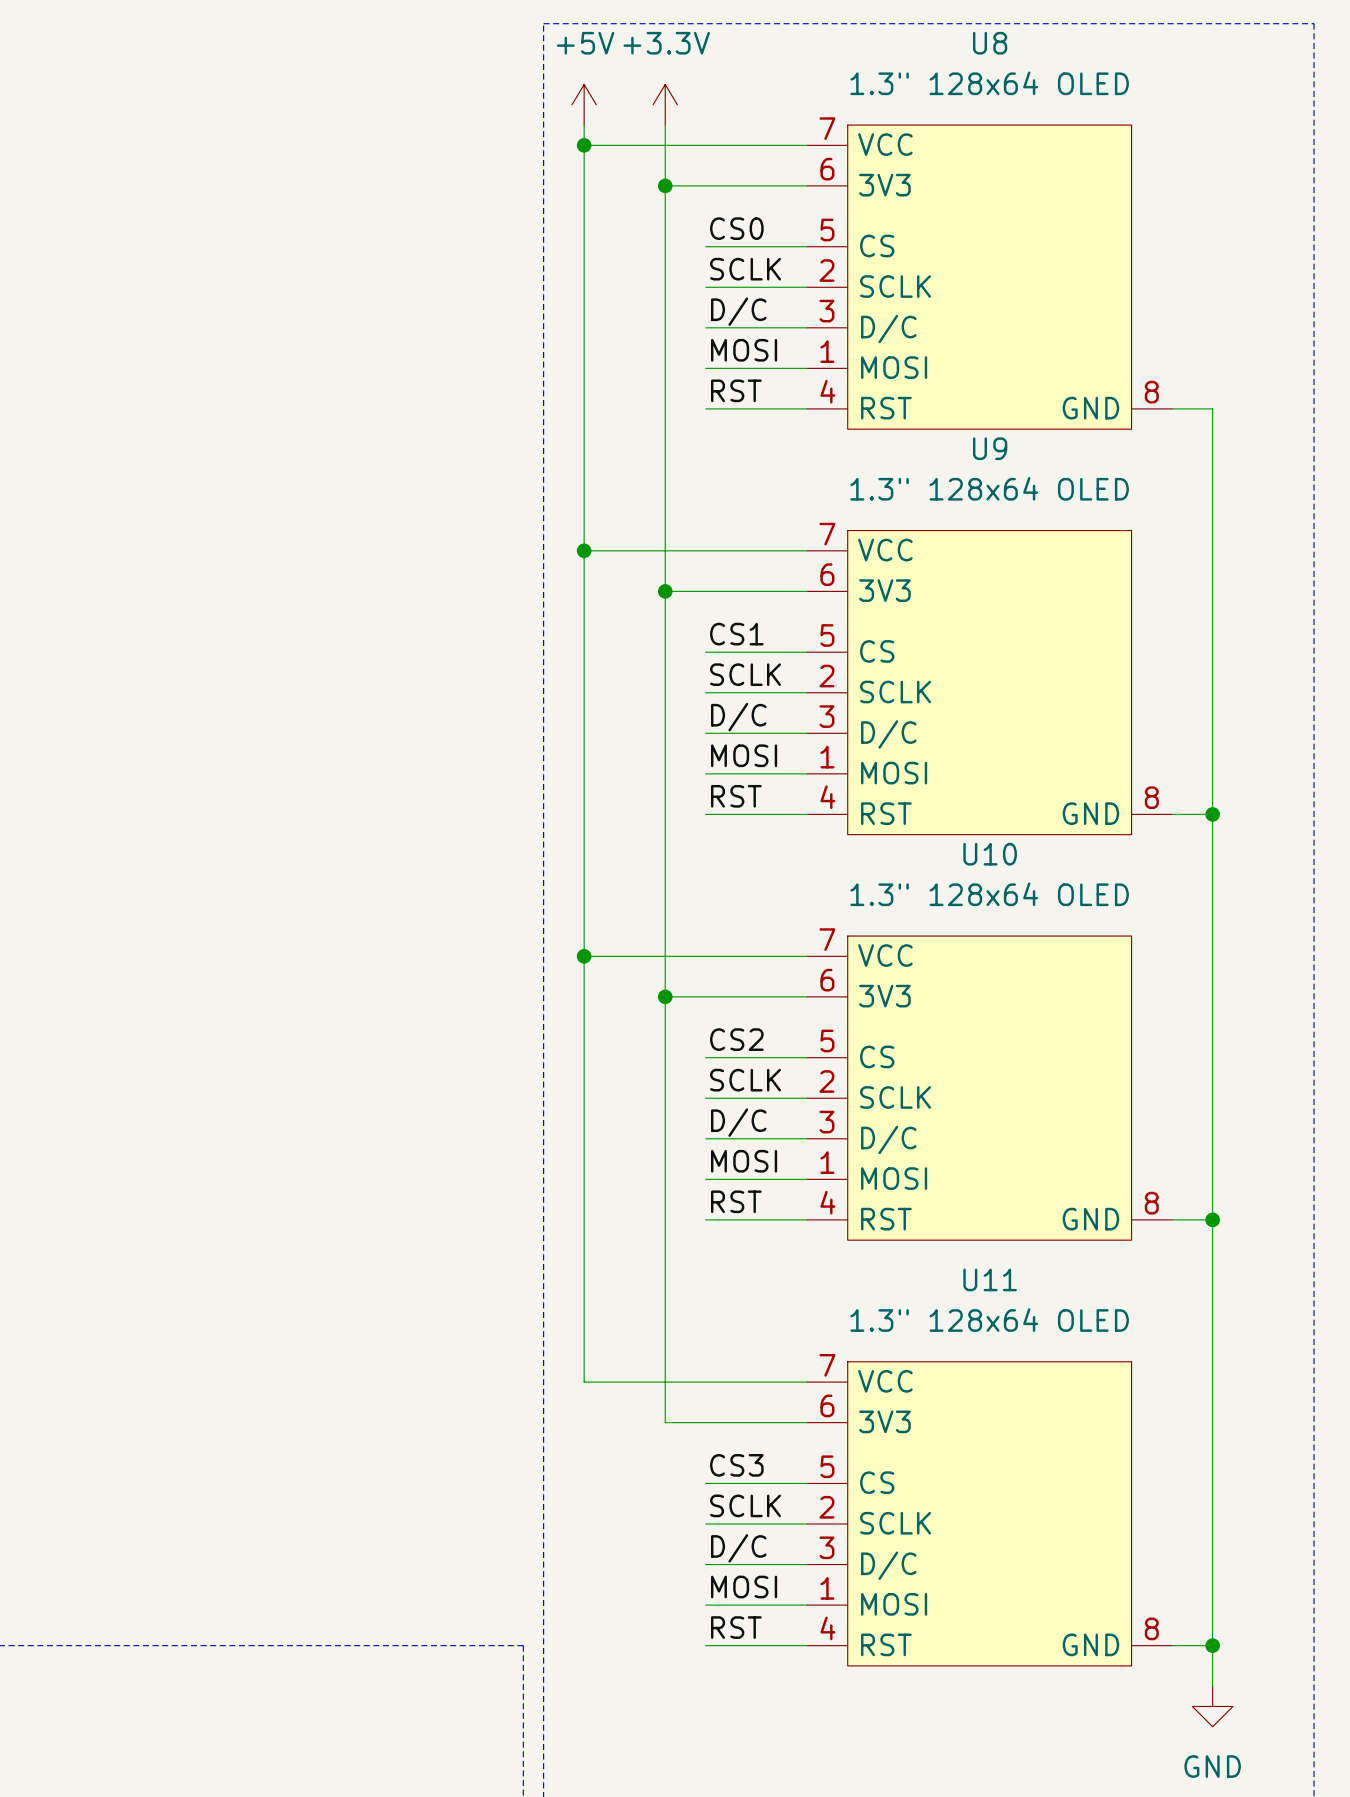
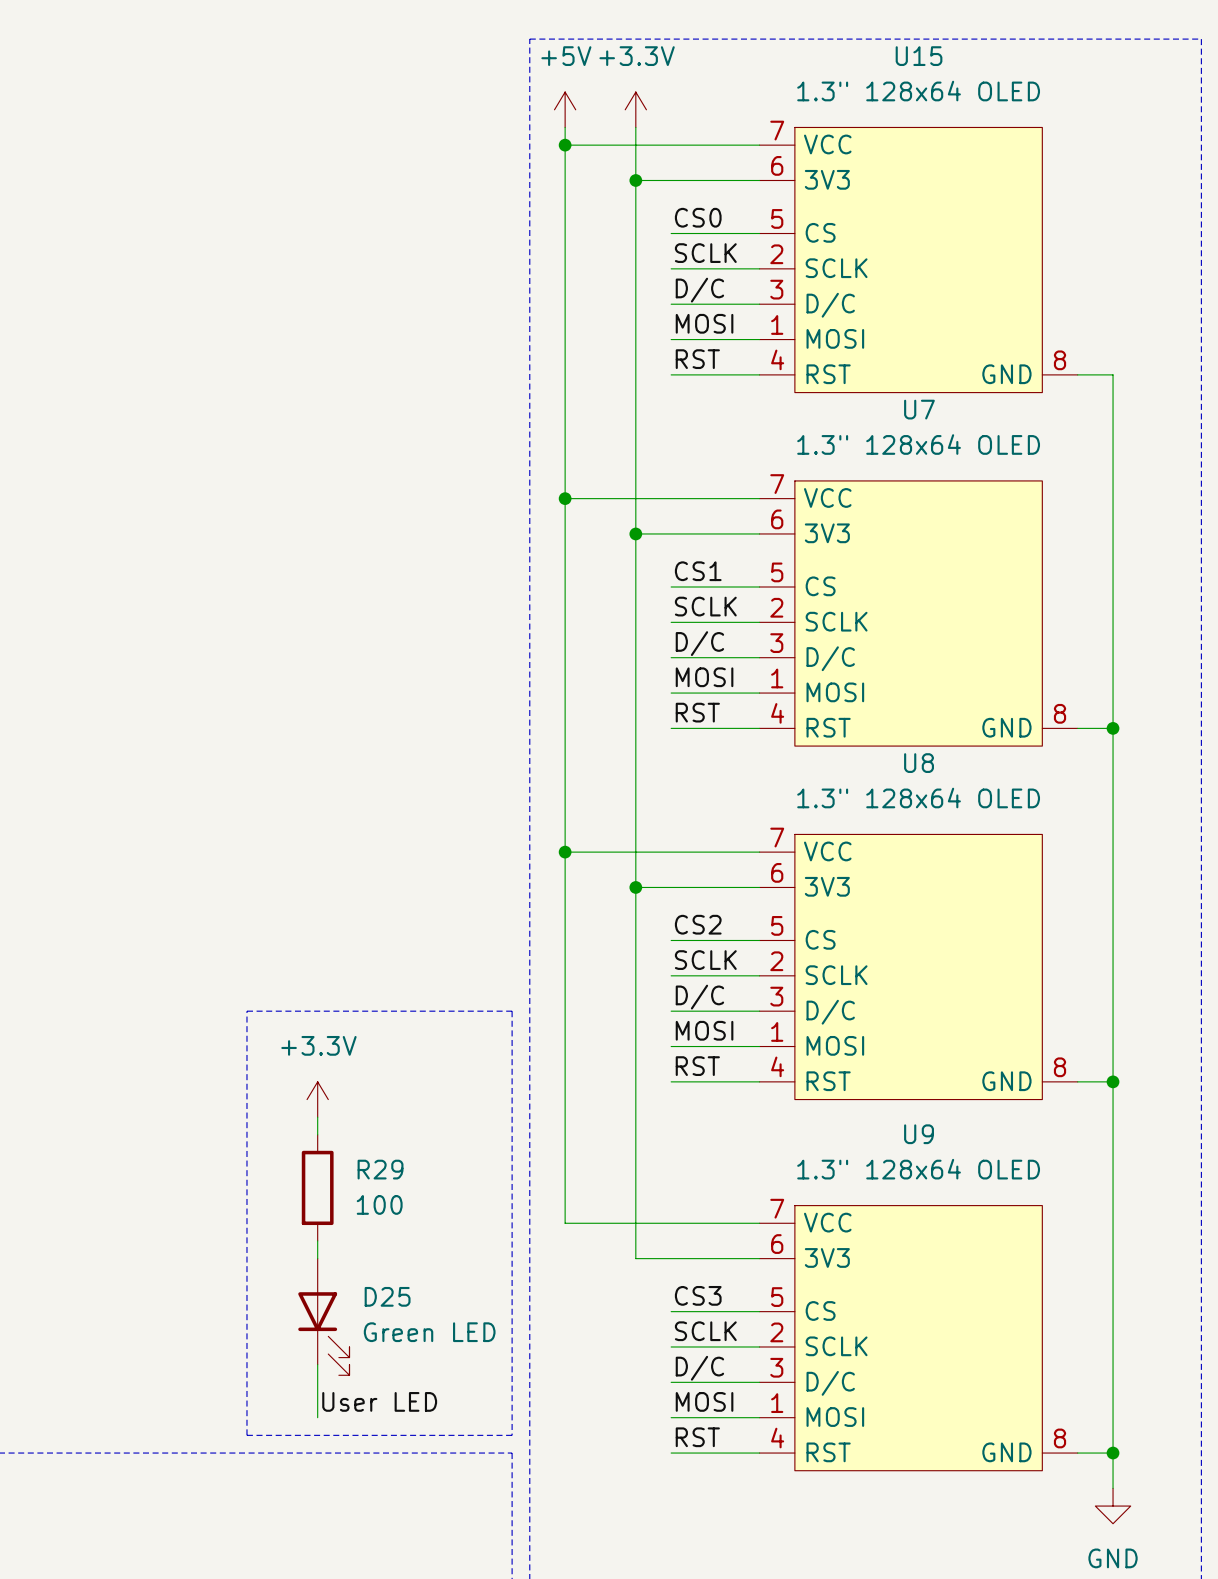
U8 name: U8 (990, 43) -> U15 (919, 56)
U9 name: U9 (990, 448) -> U7 (919, 409)
U10 name: U10 (990, 854) -> U8 (919, 763)
line: none -> (246, 1011) (512, 1011) (512, 1435) (246, 1435) (246, 1011)
power symbol: none -> +3.3V (317, 1099)
wire: none -> (317, 1117) (317, 1134)
U11 name: U11 (990, 1279) -> U9 (919, 1134)
R29: none -> 100 (317, 1187)
wire: none -> (317, 1240) (317, 1258)
D25: none -> Green LED (323, 1316)
wire: none -> (317, 1364) (317, 1417)
label: none -> User LED (379, 1401)

